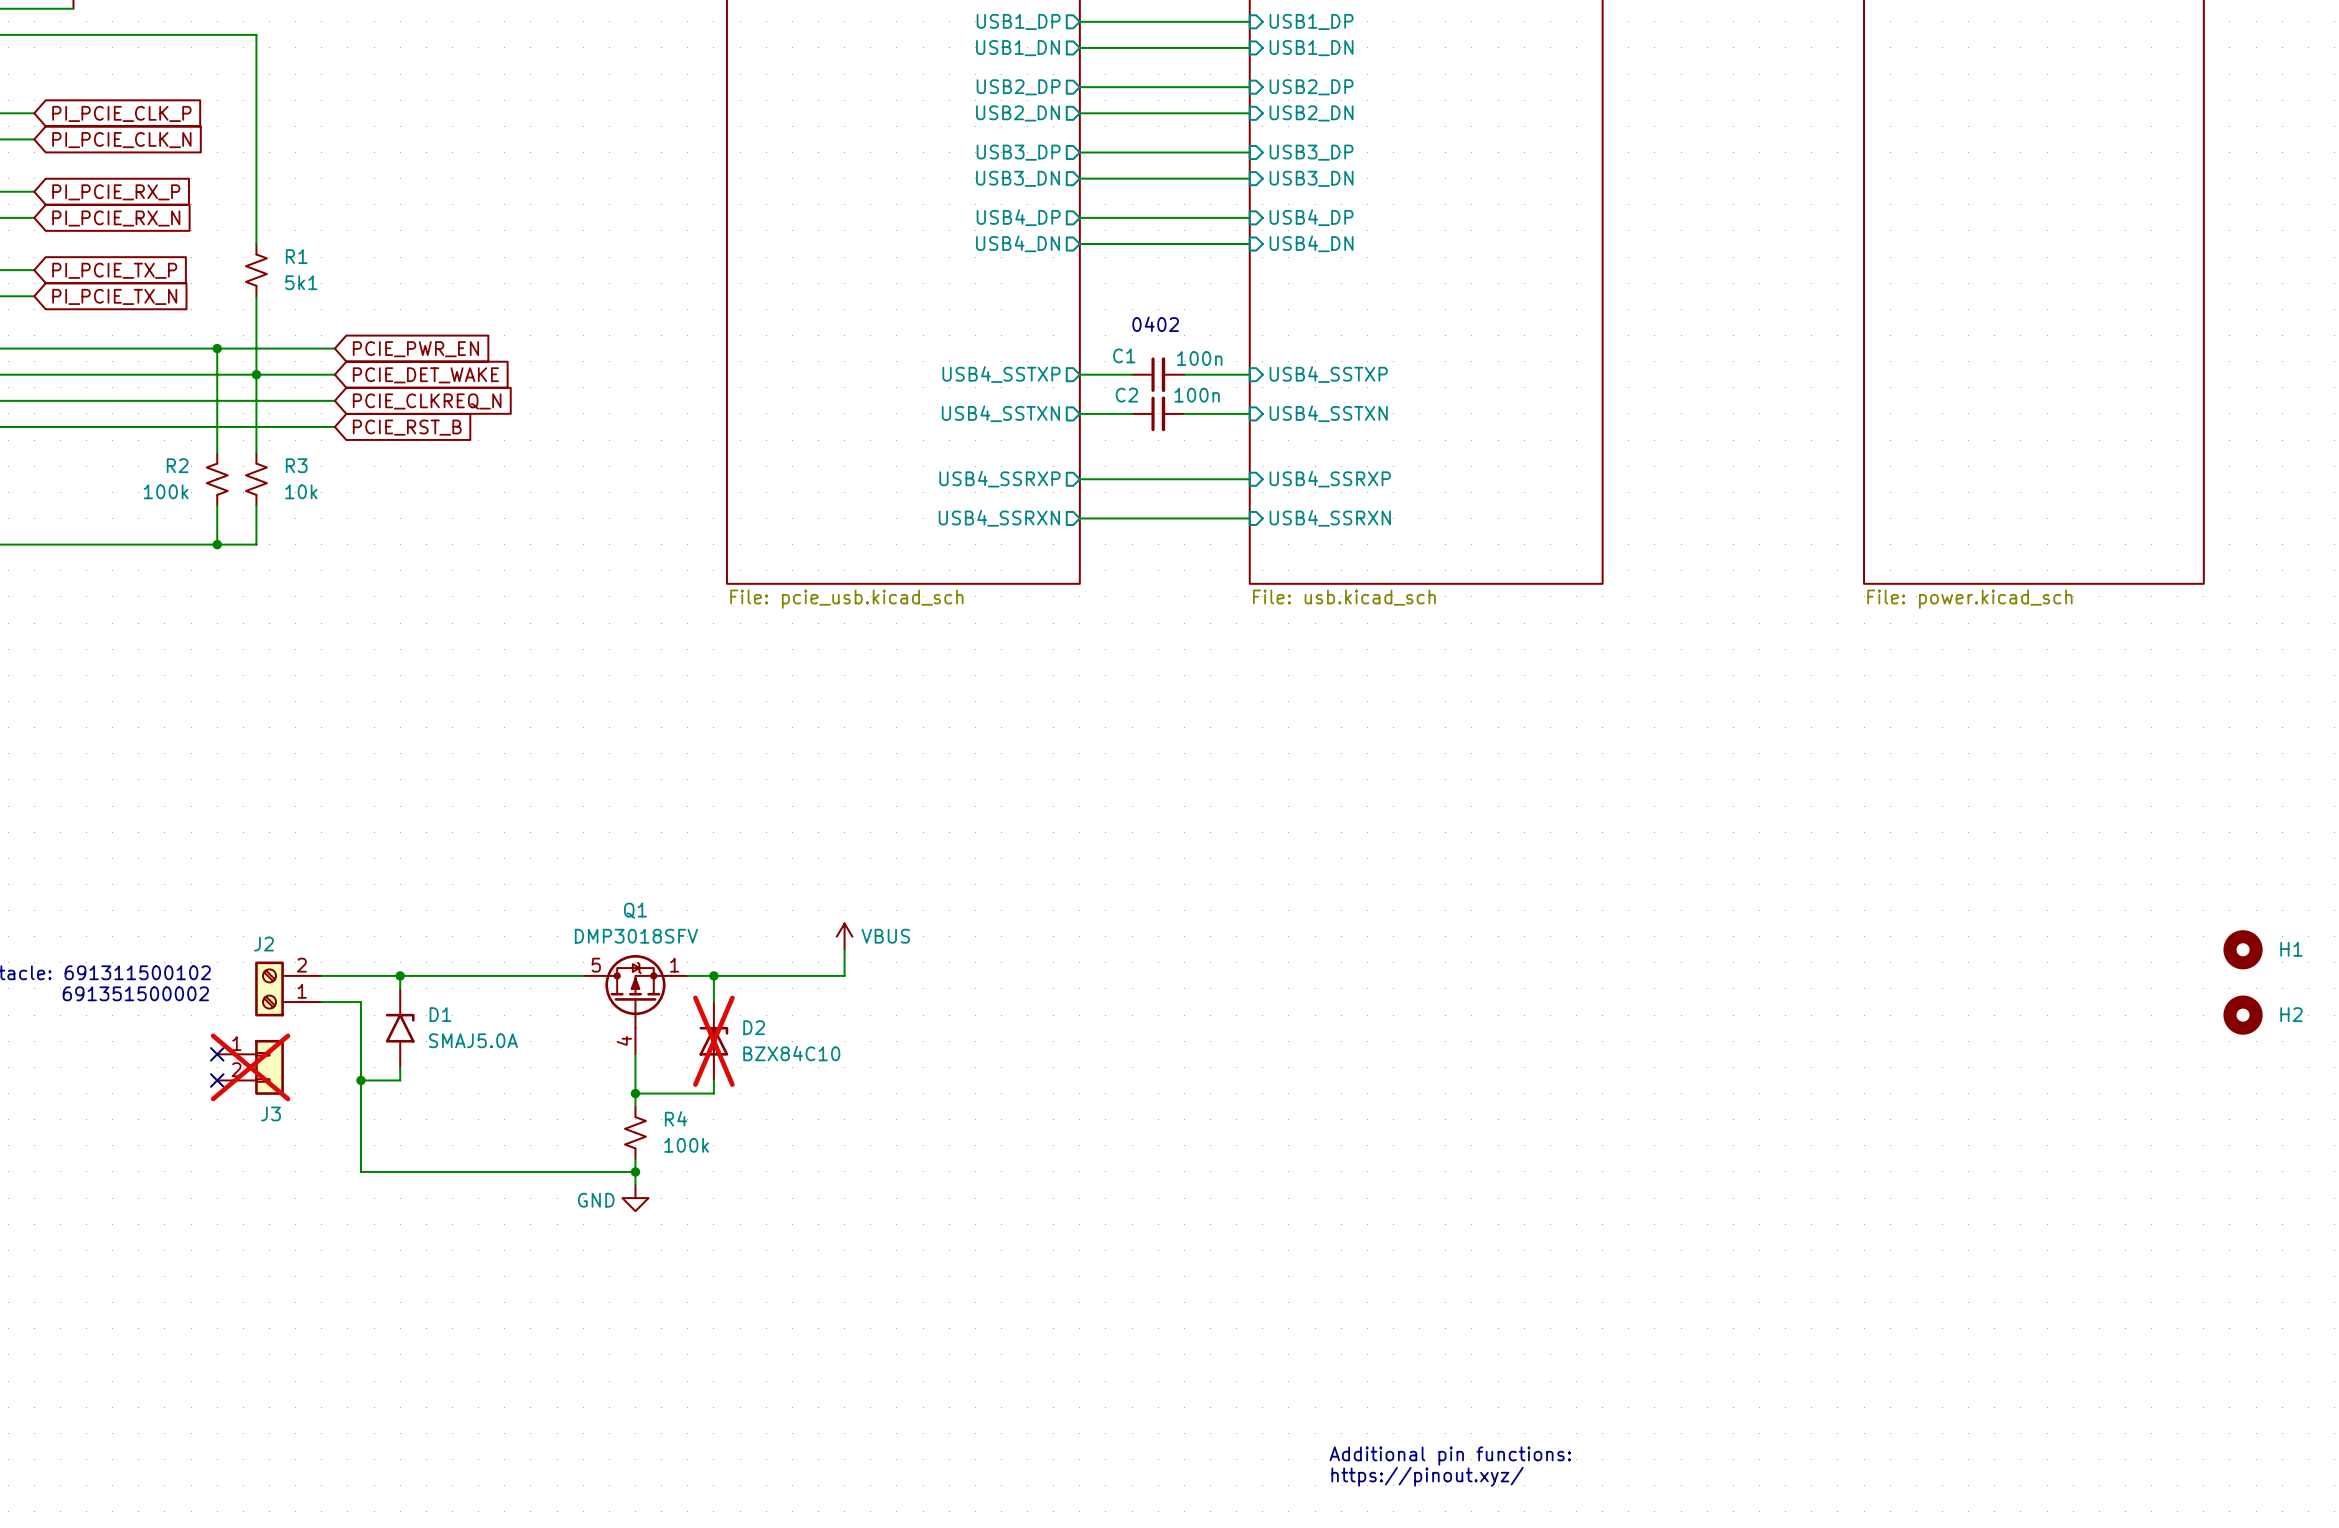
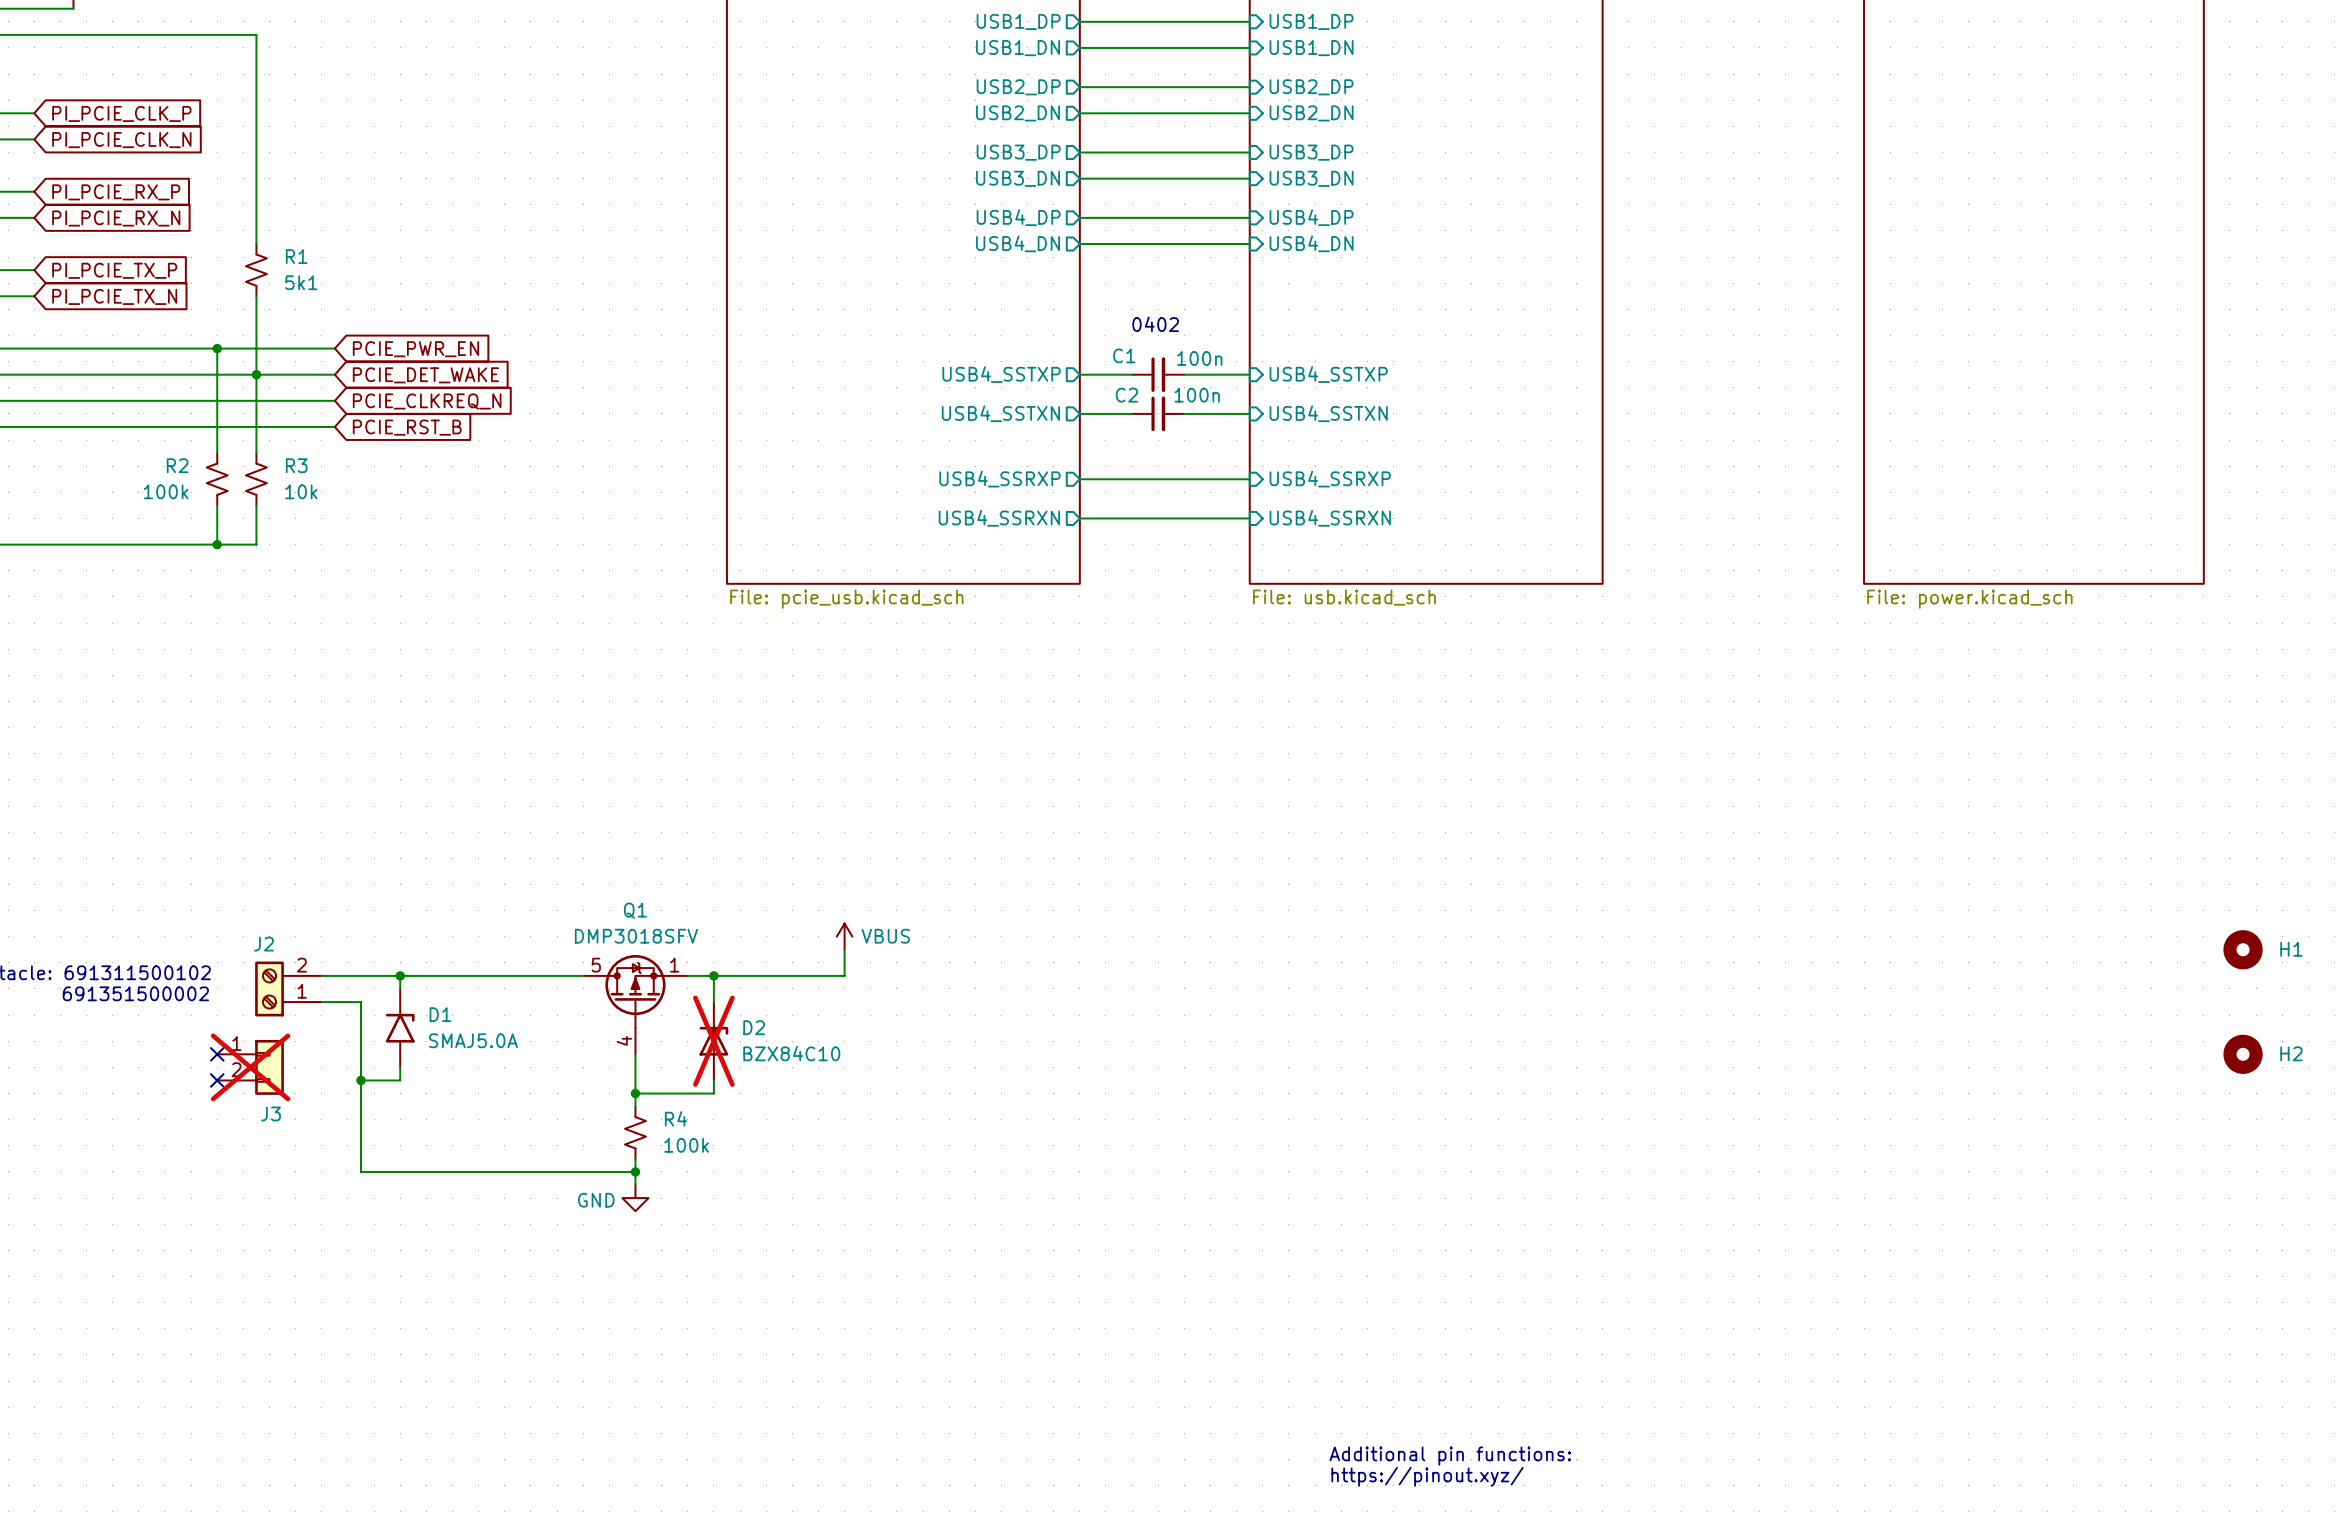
H2 position: (2243, 1015) -> (2243, 1054)

